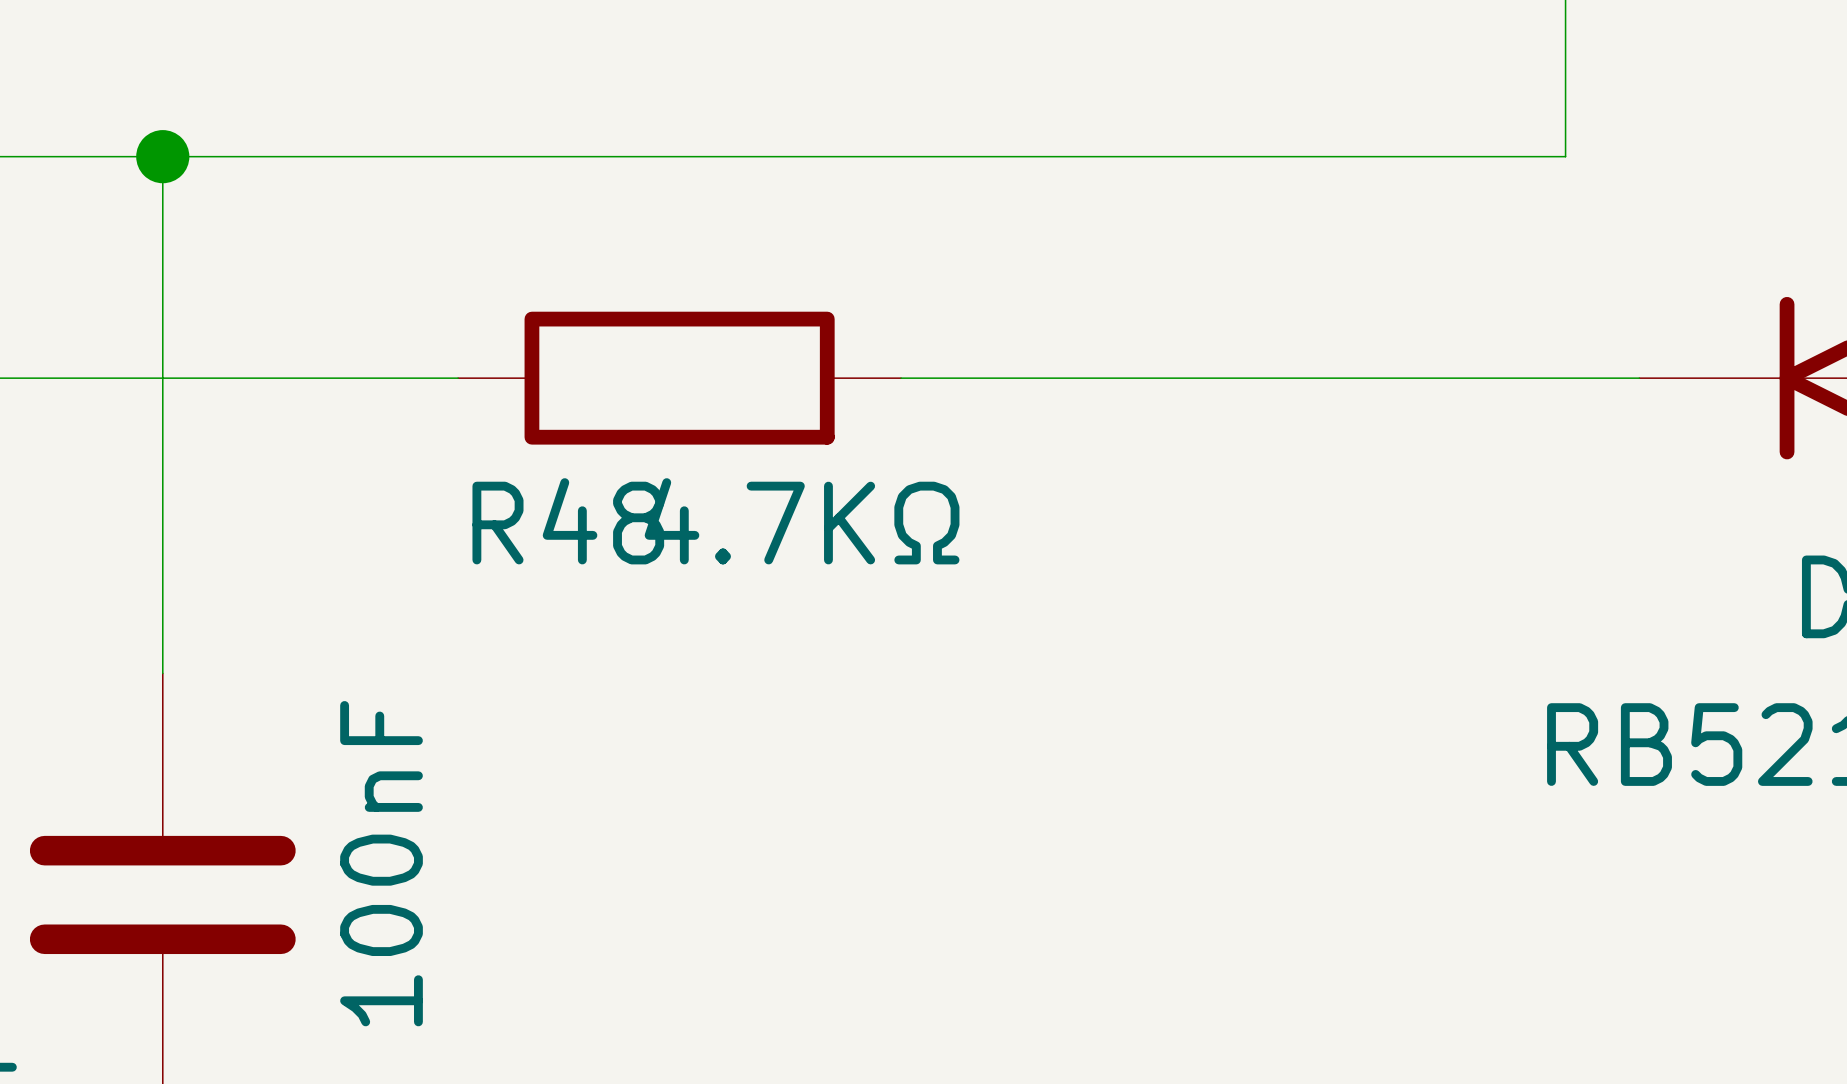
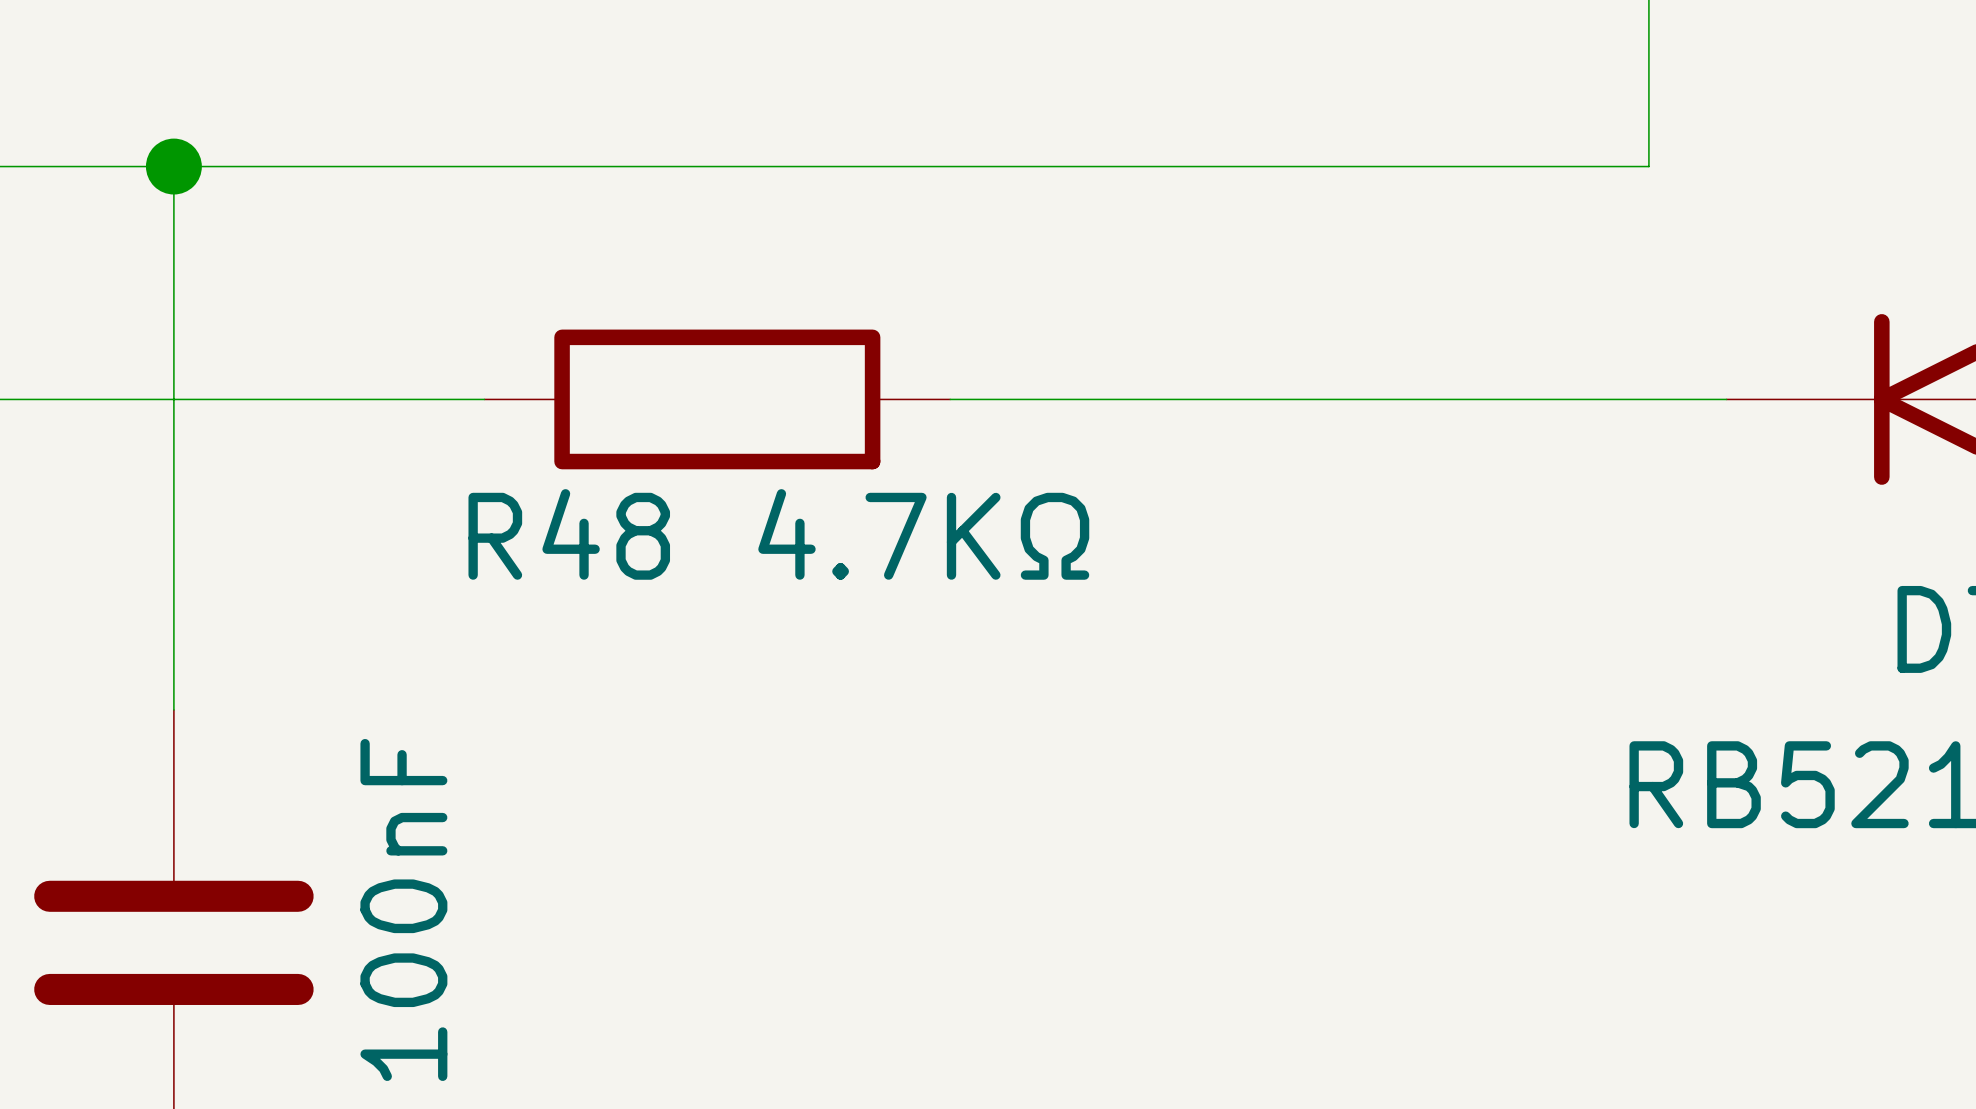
R48 name position: R48 (568, 521) -> R48 (569, 534)
R48 value position: 4.7KΩ (802, 521) -> 4.7KΩ (923, 534)

